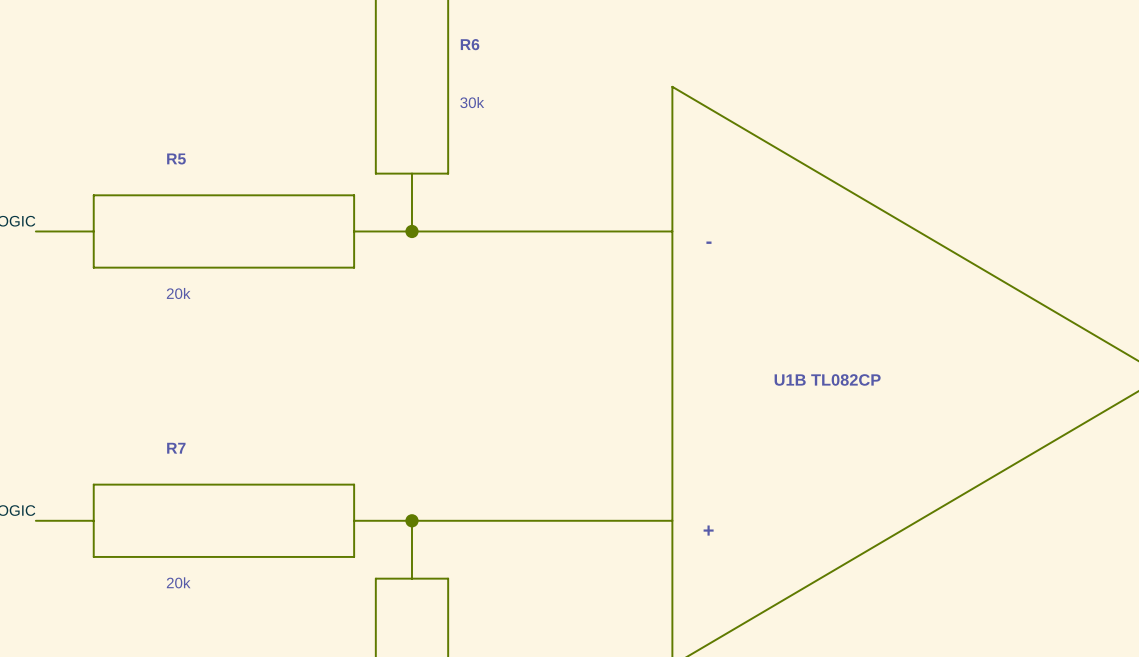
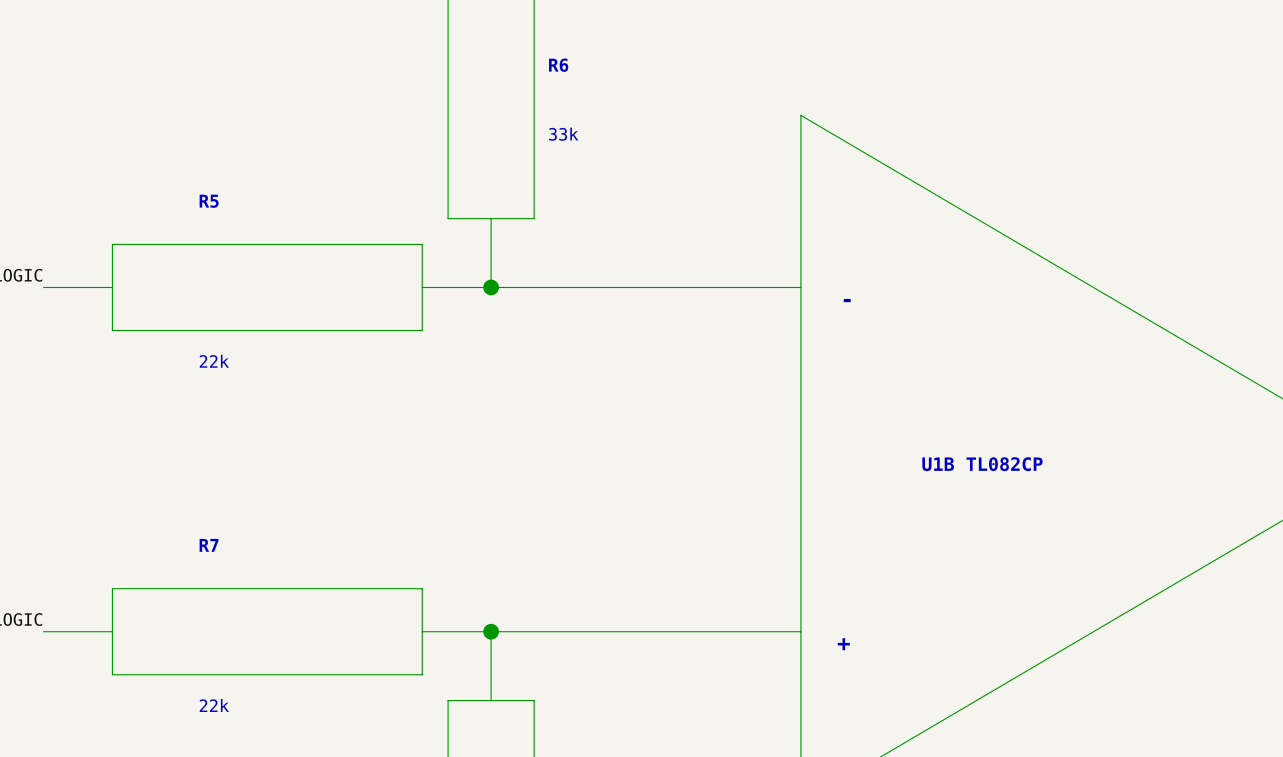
text: 30k (472, 102) -> 33k (563, 134)
text: 20k (178, 293) -> 22k (214, 361)
text: 20k (178, 582) -> 22k (214, 705)

